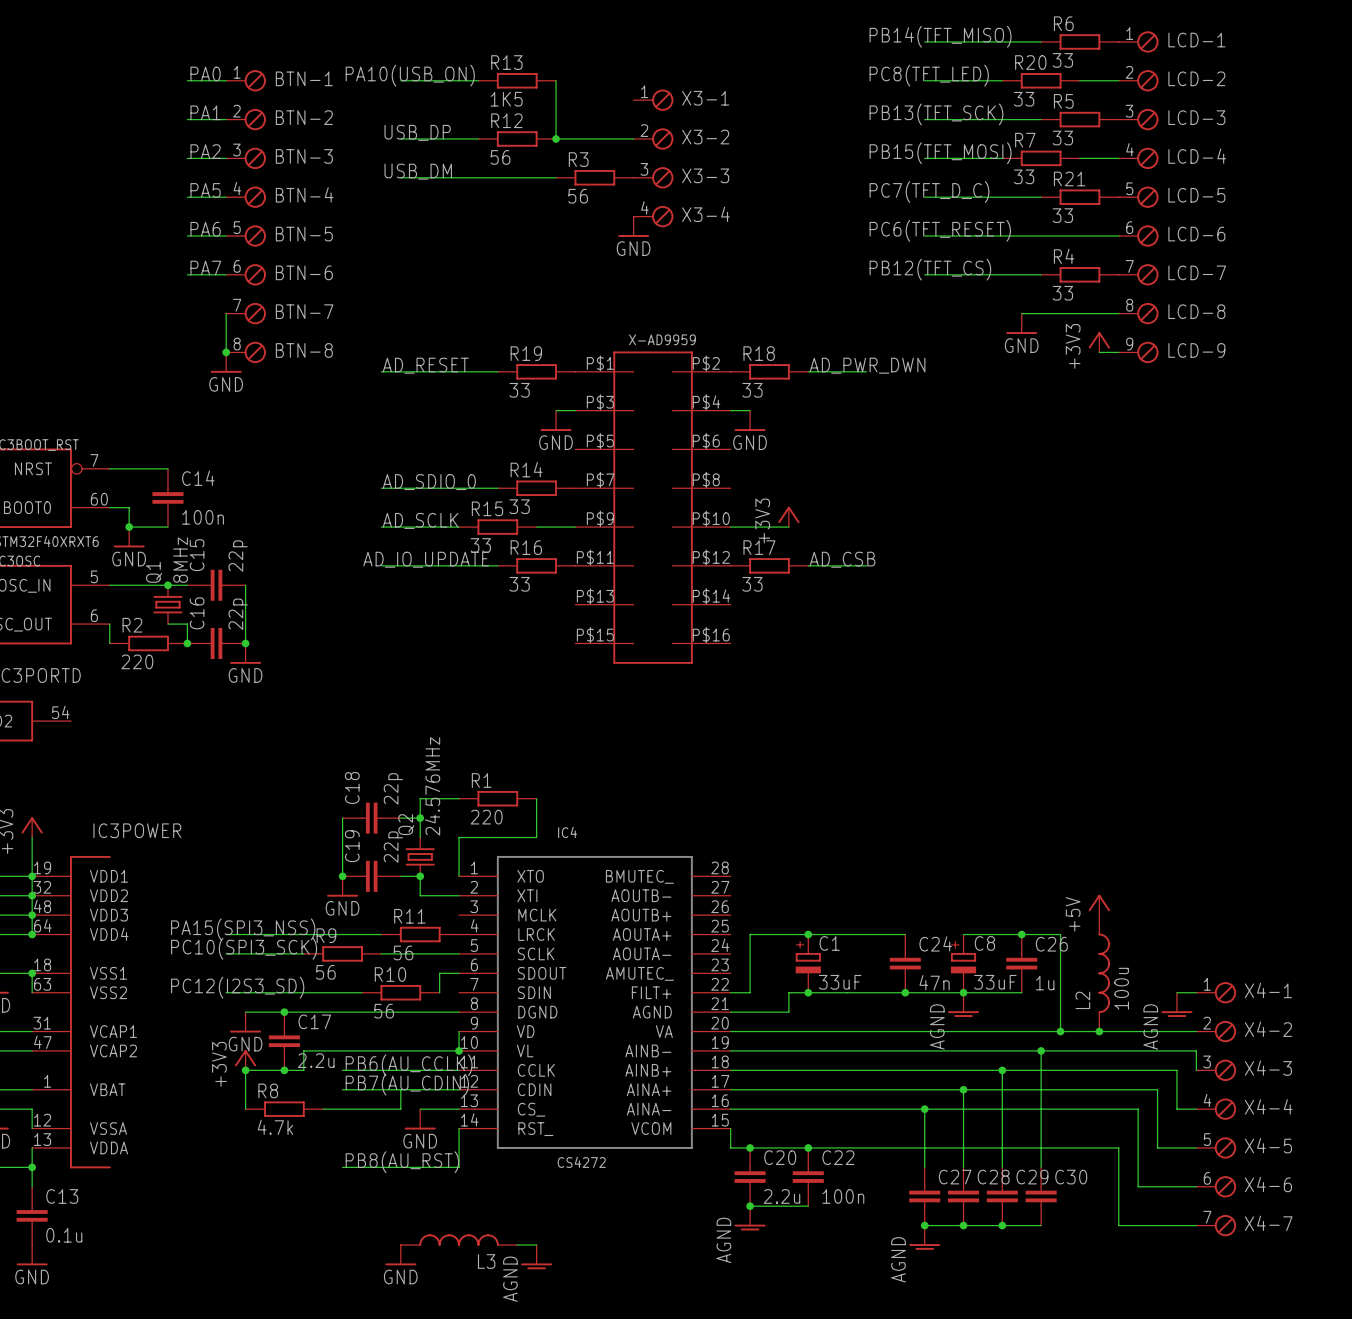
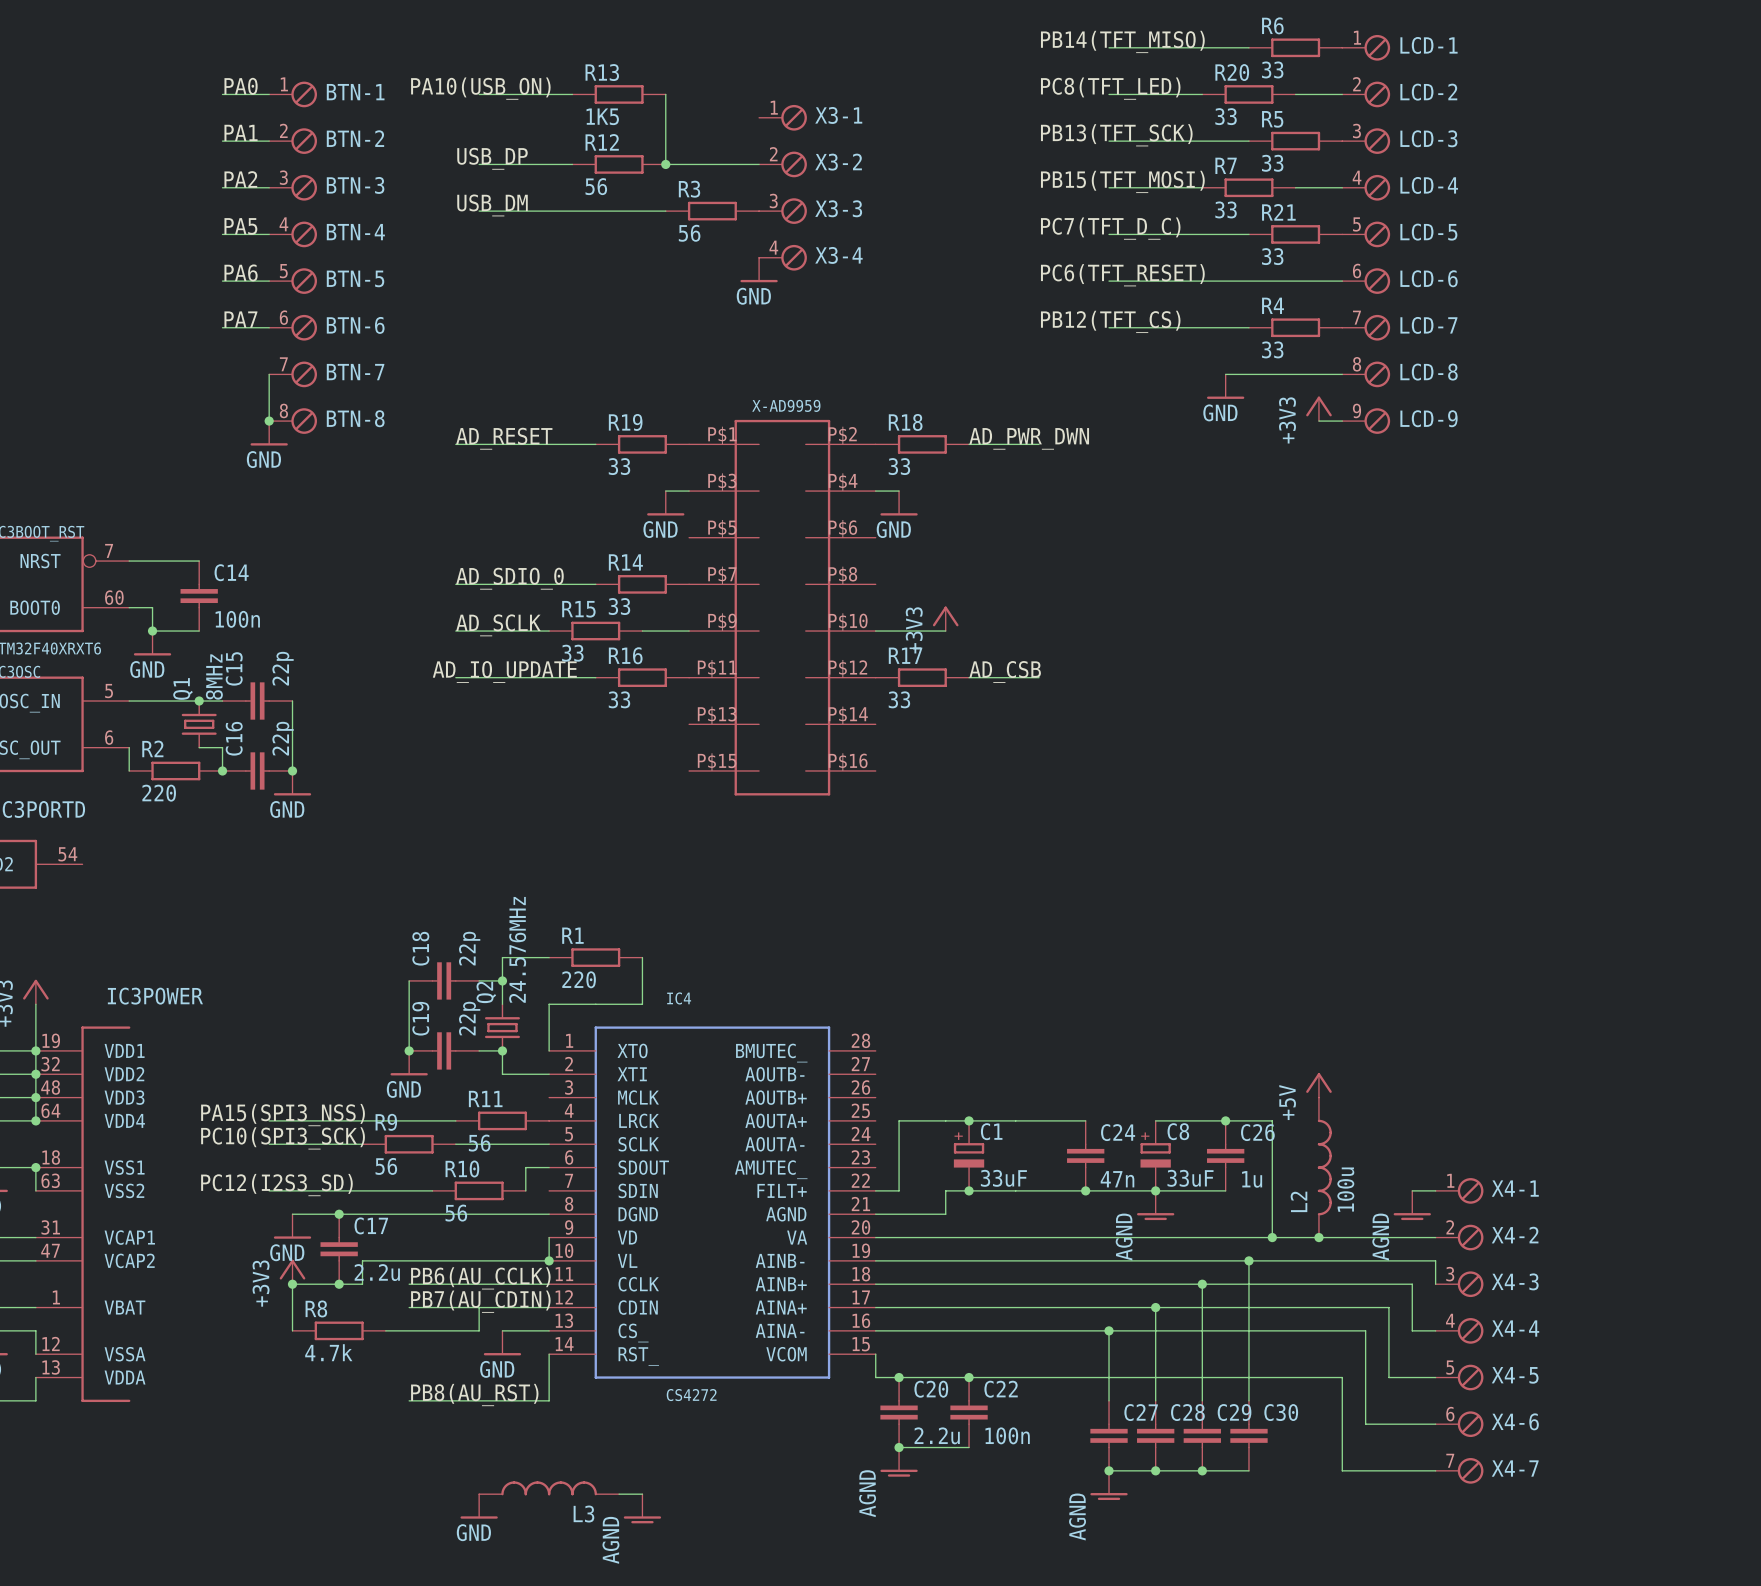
wire: (32, 1167) (32, 1186) -> none
junction: (32, 1167) -> none
C13: 0.1u (32, 1215) -> none
power symbol: GND (32, 1255) -> none

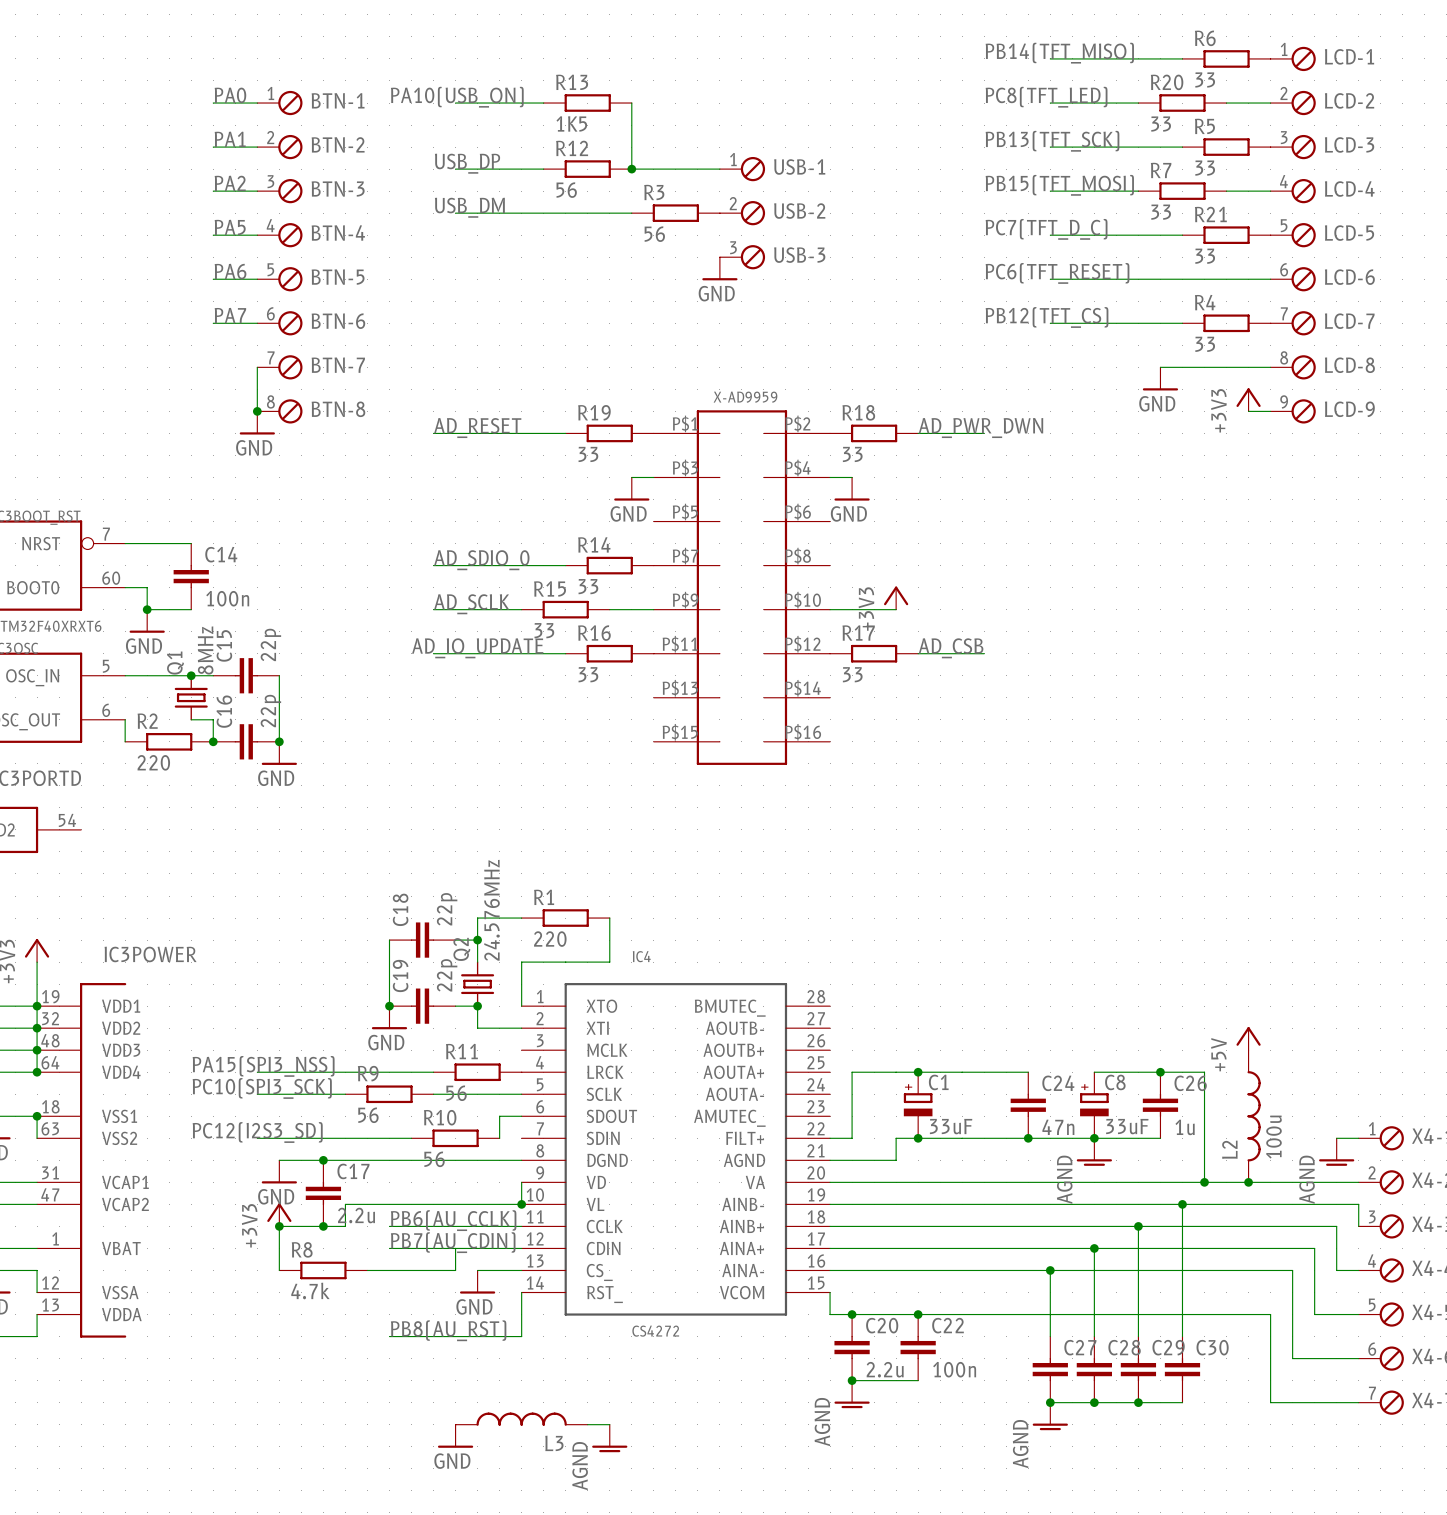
X3-1: (782, 117) -> none
X3-2 pin number: 2 (773, 154) -> 1 (733, 159)
X3-2 name: X3-2 (838, 162) -> USB-1 (799, 166)
X3-3 pin number: 3 (773, 201) -> 2 (733, 203)
X3-3 name: X3-3 (838, 208) -> USB-2 (799, 211)
X3-4 pin number: 4 (773, 247) -> 3 (733, 247)
X3-4 name: X3-4 (838, 255) -> USB-3 (799, 255)

